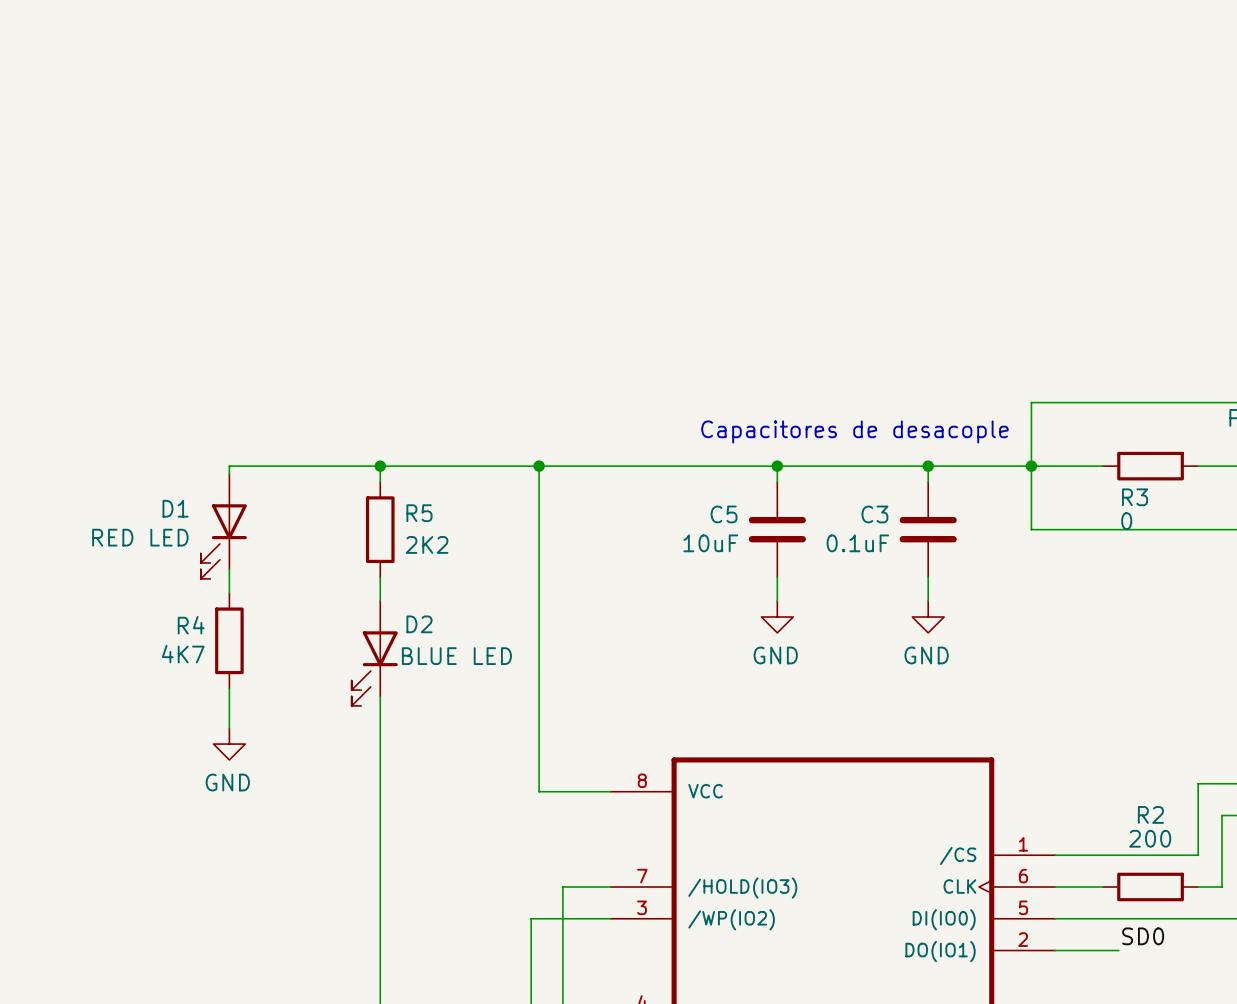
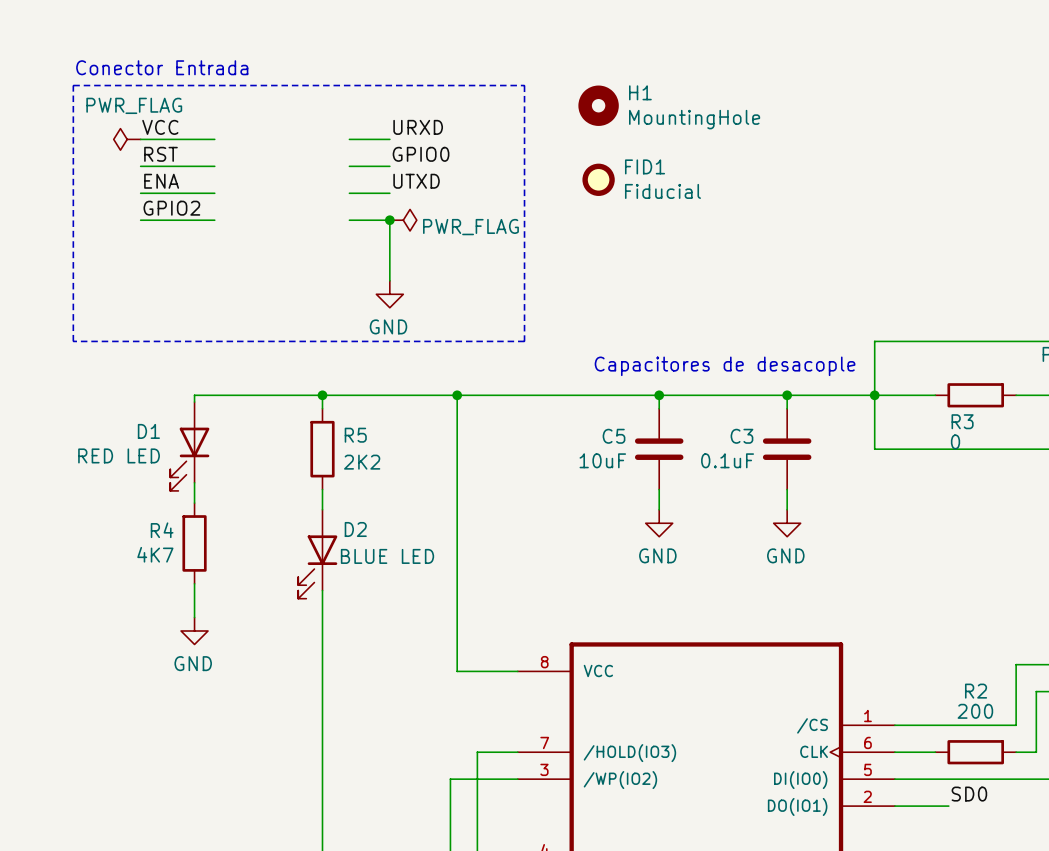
text: none -> Conector Entrada (162, 67)
line: none -> (73, 85) (524, 85) (524, 341) (73, 341) (73, 85)
H1: none -> MountingHole (598, 105)
label: none -> VCC (160, 127)
label: none -> URXD (418, 127)
power symbol: none -> PWR_FLAG (127, 139)
wire: none -> (140, 139) (214, 139)
wire: none -> (349, 139) (389, 139)
label: none -> RST (160, 154)
label: none -> GPIO0 (421, 154)
wire: none -> (140, 166) (214, 166)
wire: none -> (349, 166) (389, 166)
FID1: none -> Fiducial (598, 179)
label: none -> ENA (161, 181)
label: none -> UTXD (416, 181)
wire: none -> (140, 193) (214, 193)
wire: none -> (349, 193) (389, 193)
label: none -> GPIO2 (171, 208)
wire: none -> (140, 220) (214, 220)
wire: none -> (349, 220) (389, 220) (389, 280)
junction: none -> (389, 220)
power symbol: none -> PWR_FLAG (403, 220)
power symbol: none -> GND (389, 294)

